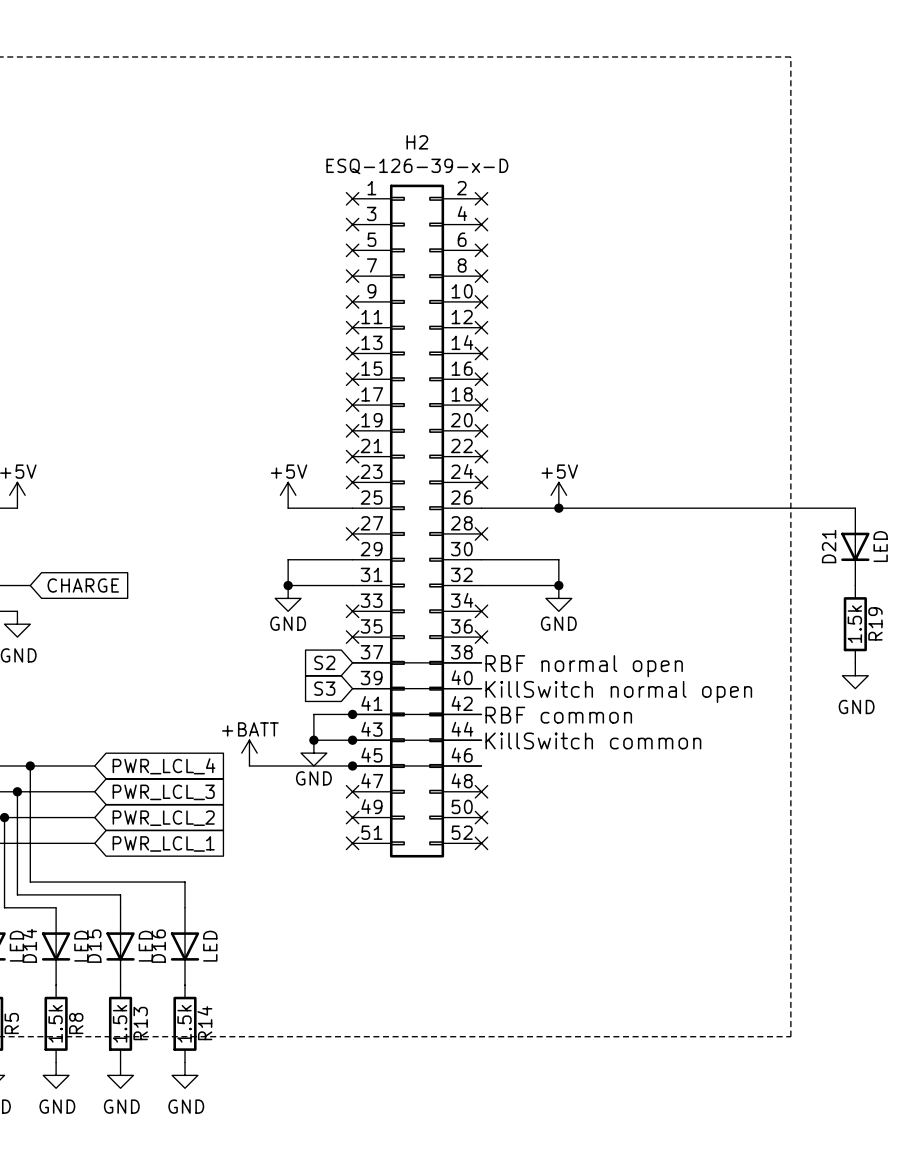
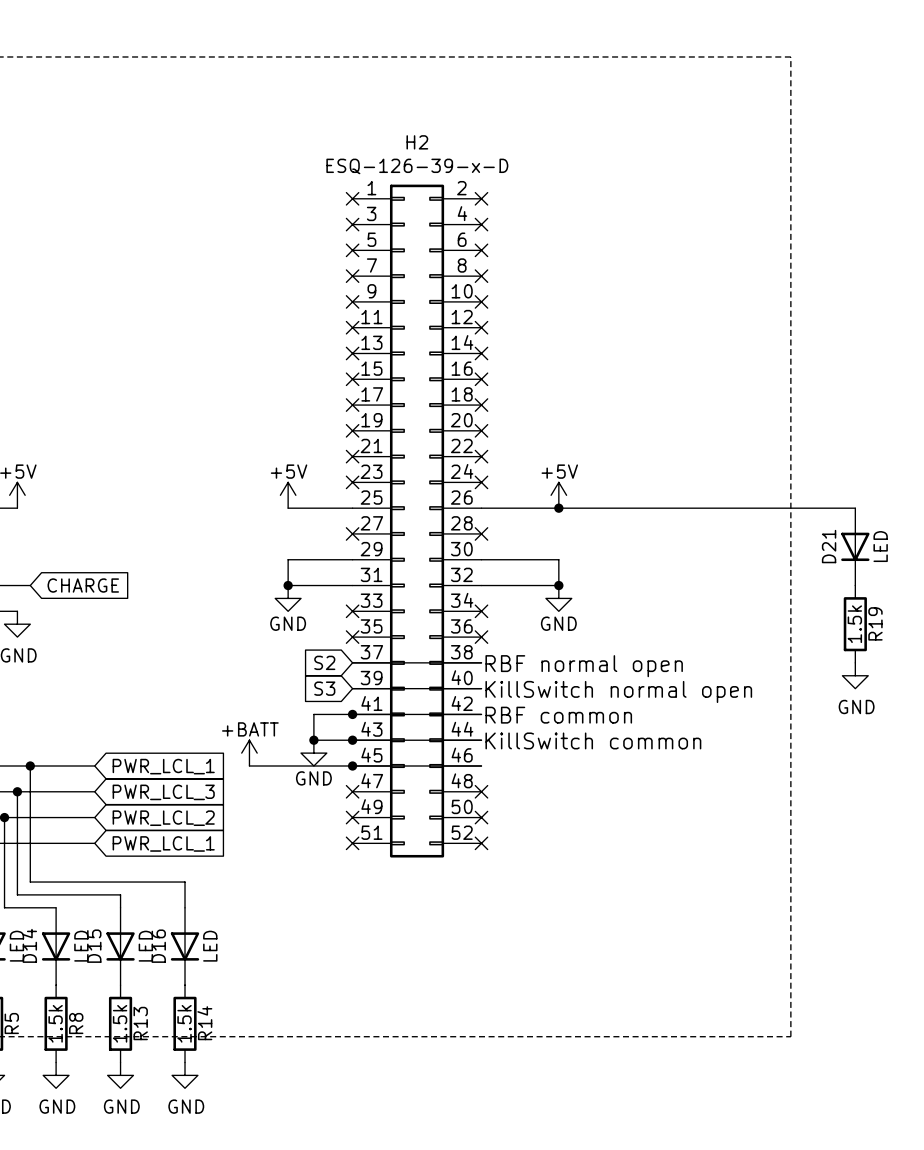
global label: PWR_LCL_4 (164, 766) -> PWR_LCL_1 (163, 766)

